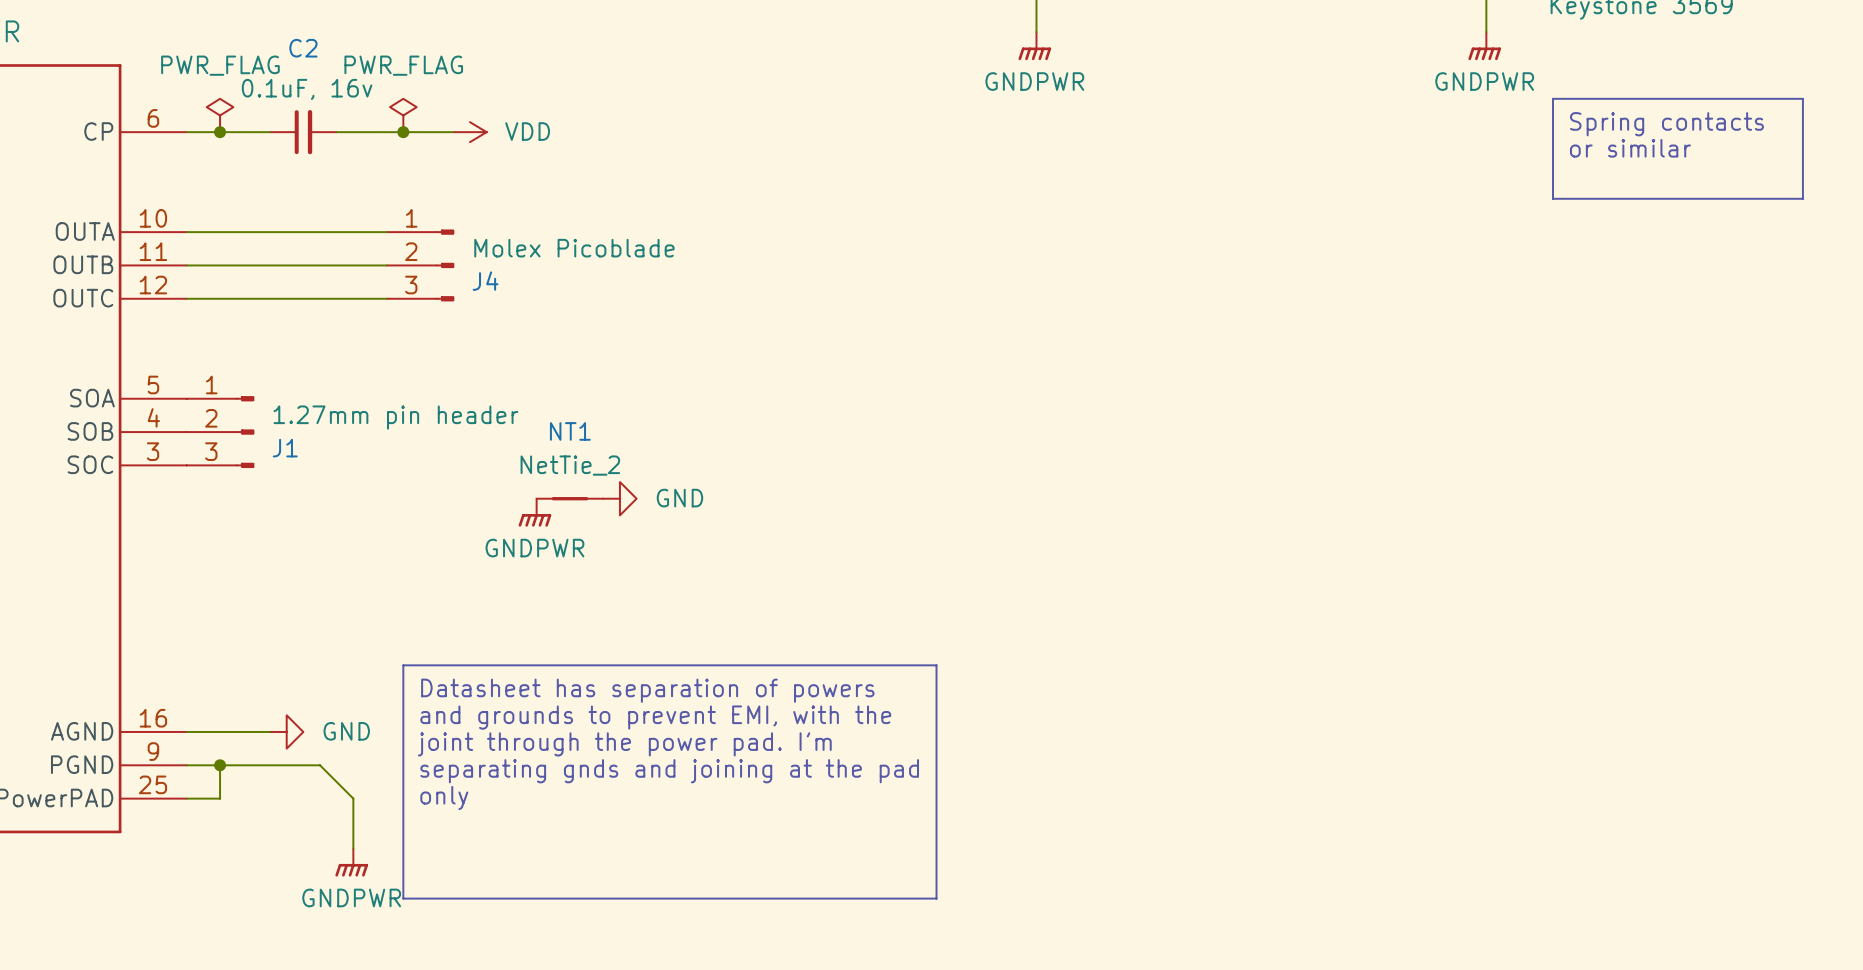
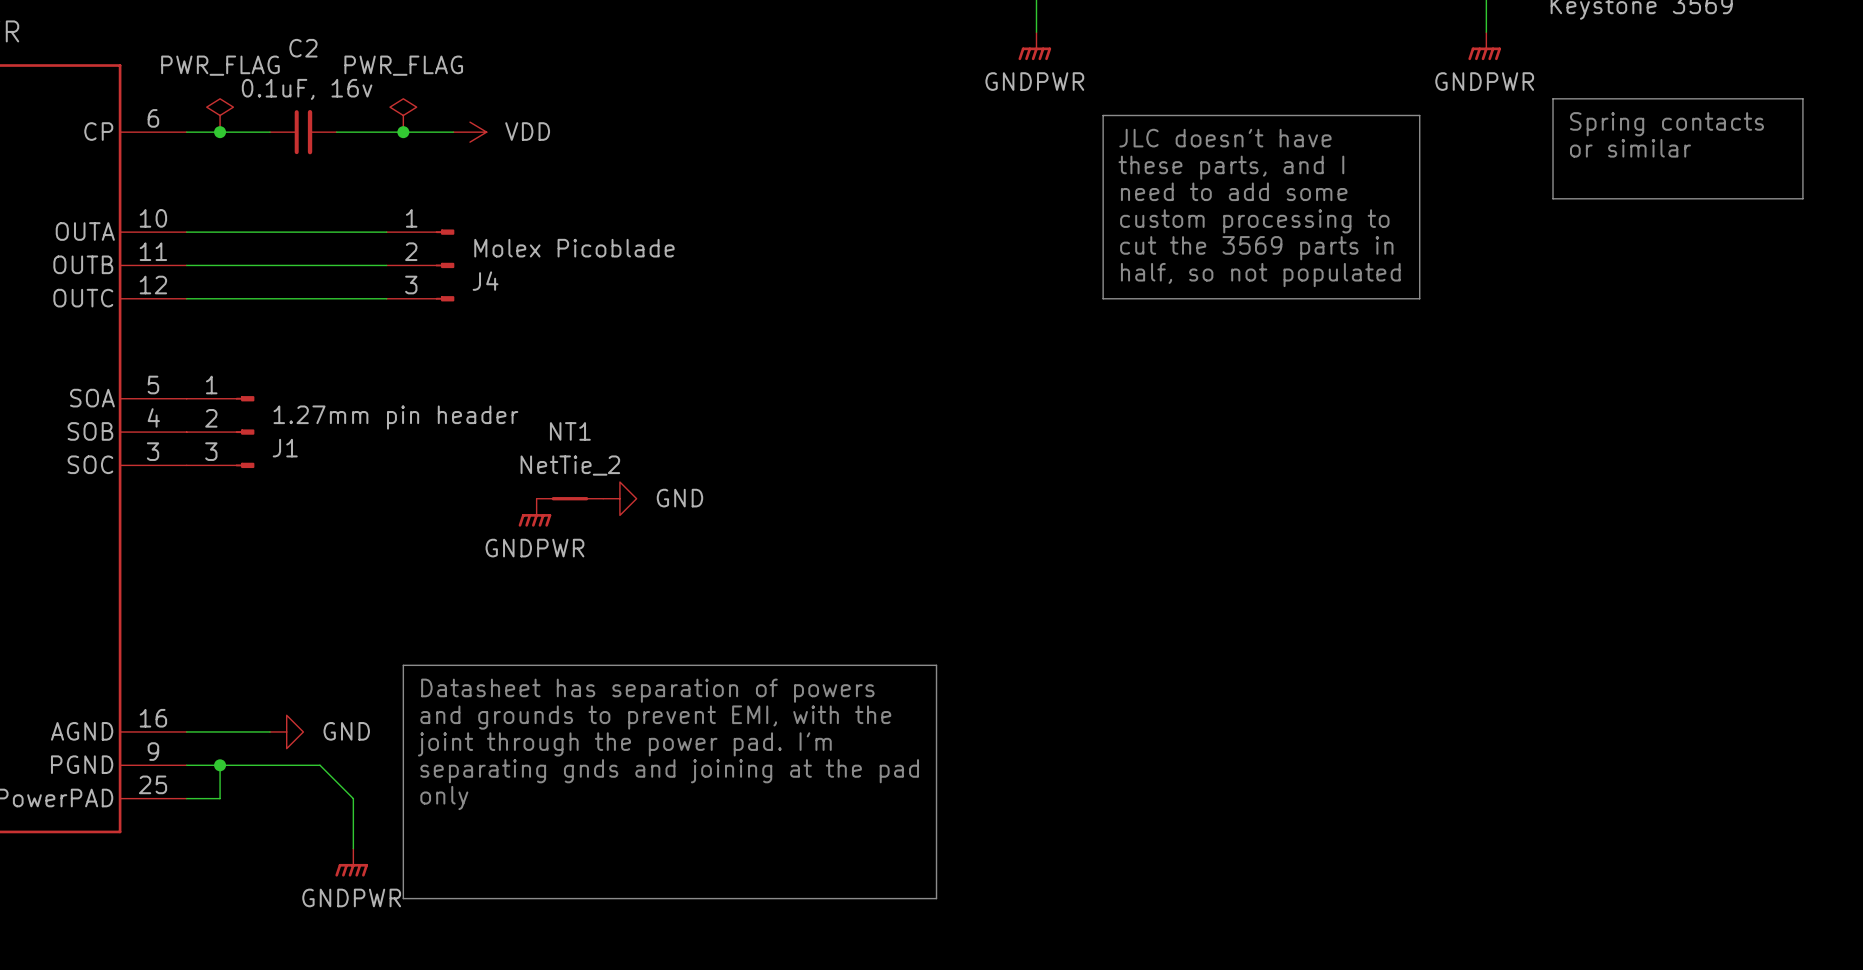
line: none -> (1103, 115) (1419, 115) (1419, 298) (1103, 298) (1103, 115)
text: none -> JLC doesn't have (1225, 138)
text: none -> these parts, and I (1231, 167)
text: none -> need to add some (1234, 191)
text: none -> custom processing to (1254, 221)
text: none -> cut the 3569 parts in (1256, 248)
text: none -> half, so not populated (1260, 275)

